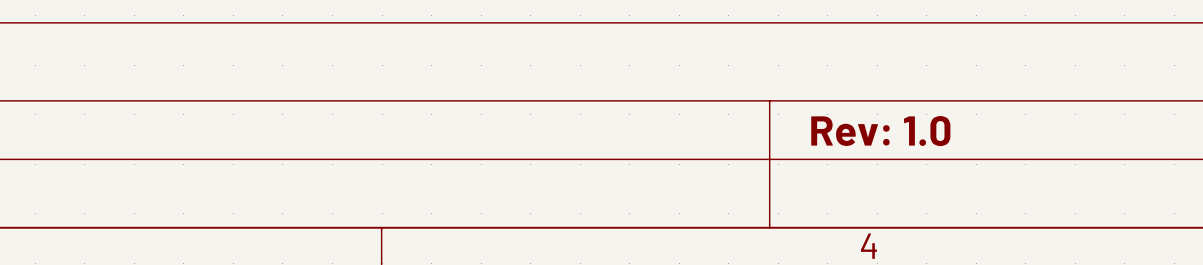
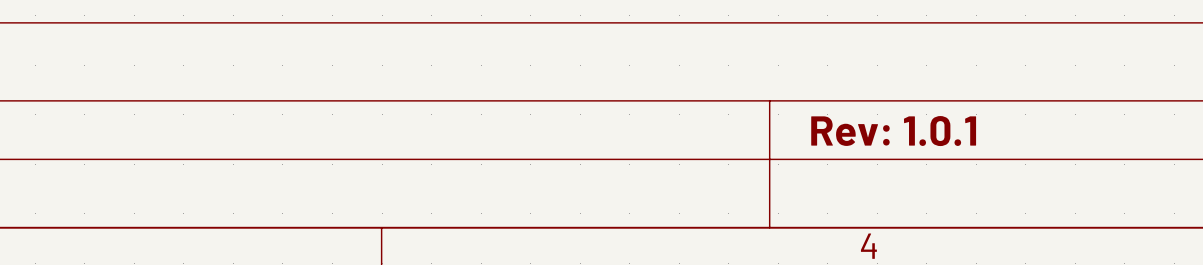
title block: Rev: 1.0 (880, 131) -> Rev: 1.0.1 (893, 131)

